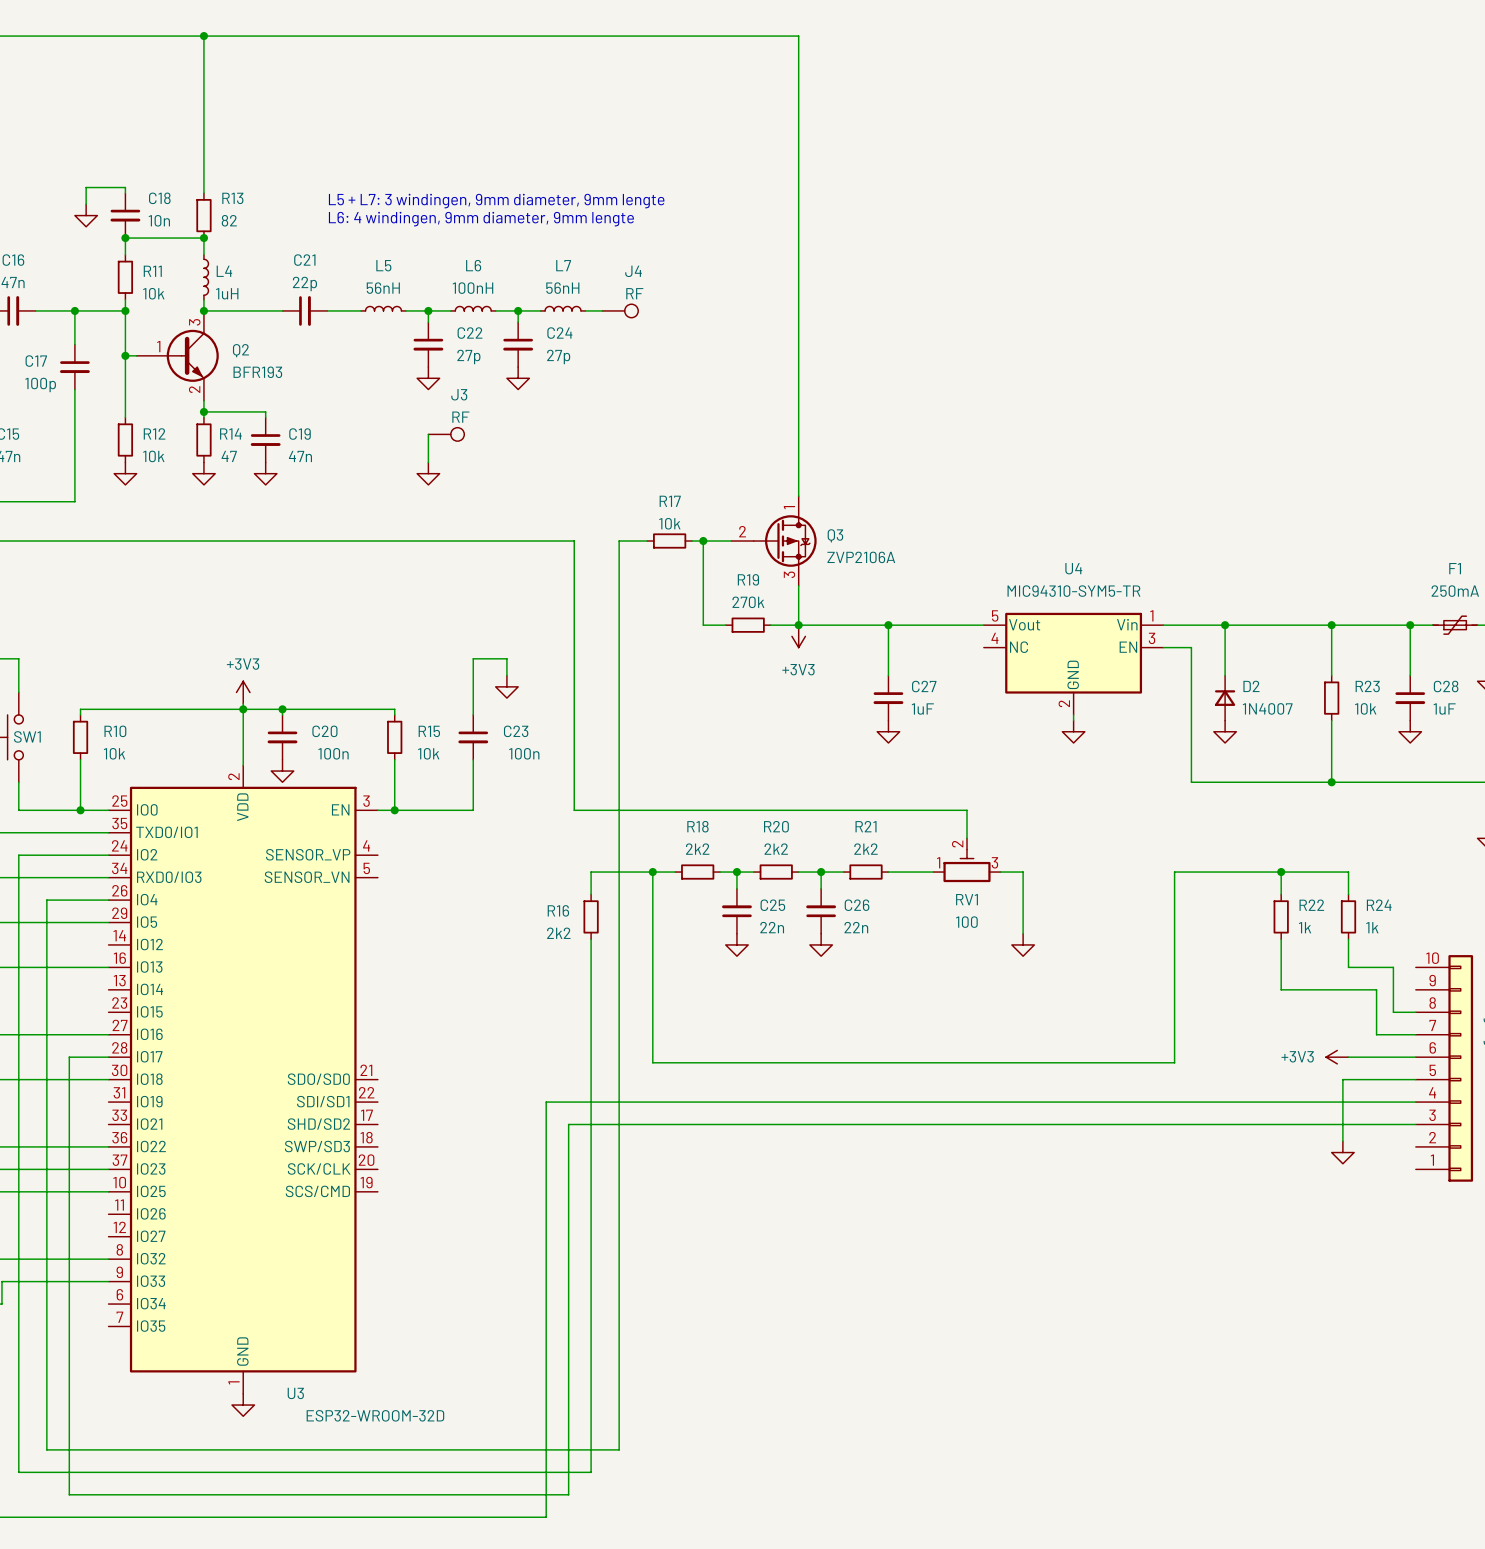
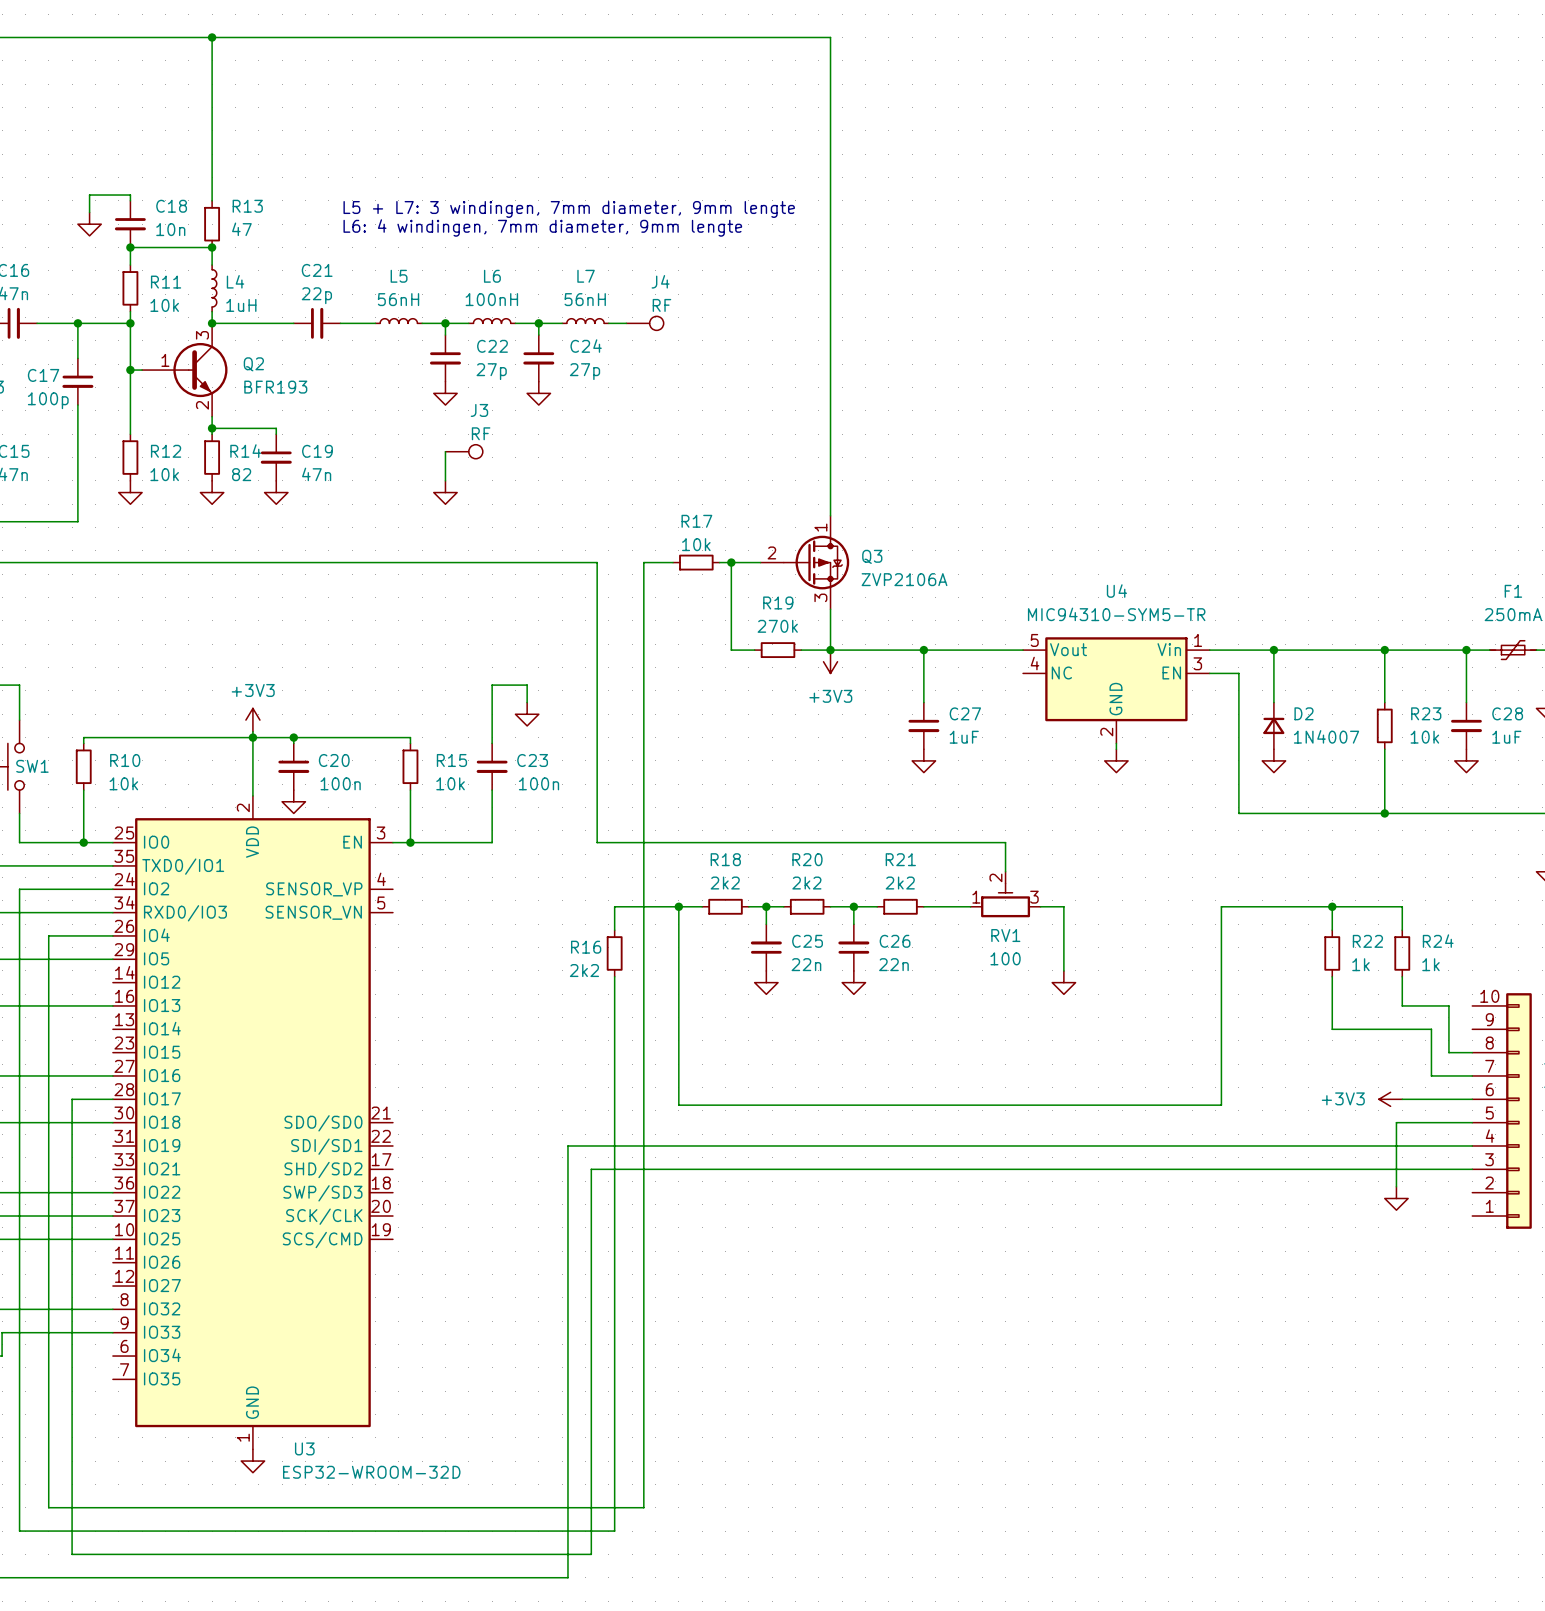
text: L5 + L7: 3 windingen, 9mm diameter, 9mm lengte (496, 201) -> L5 + L7: 3 windingen, 7mm diameter, 9mm lengte (569, 209)
text: L6: 4 windingen, 9mm diameter, 9mm lengte (481, 219) -> L6: 4 windingen, 7mm diameter, 9mm lengte (542, 227)
R13 value: 82 (229, 220) -> 47 (241, 229)
R14 value: 47 (229, 456) -> 82 (241, 474)

